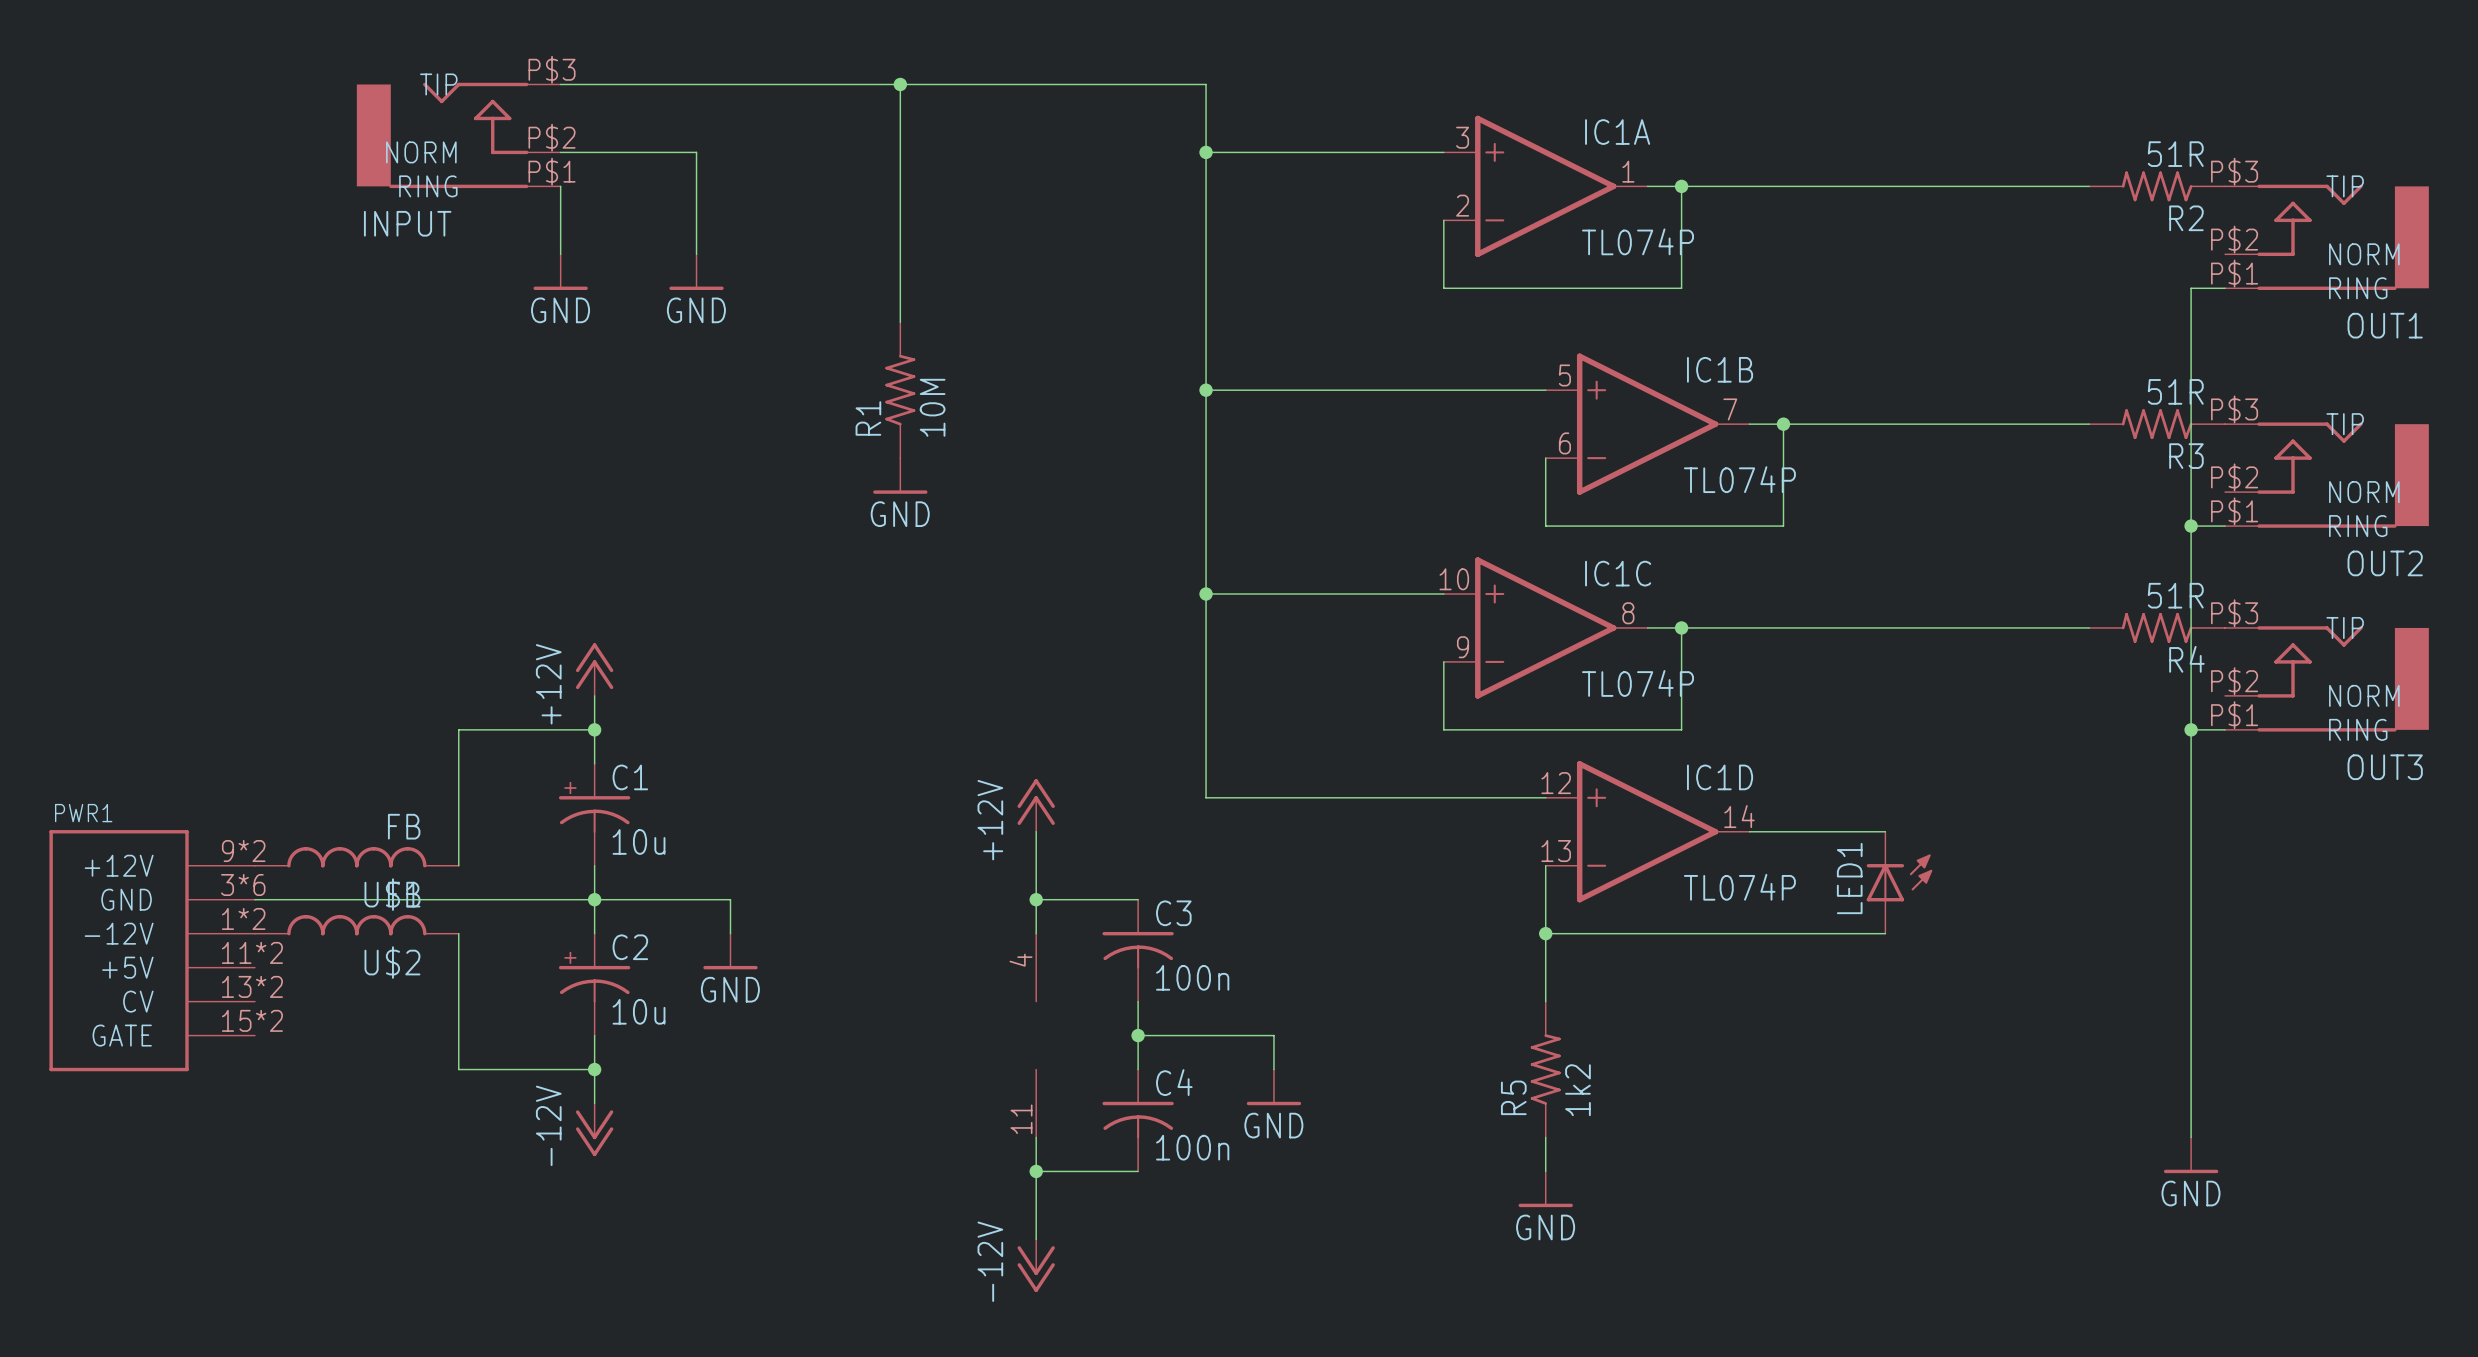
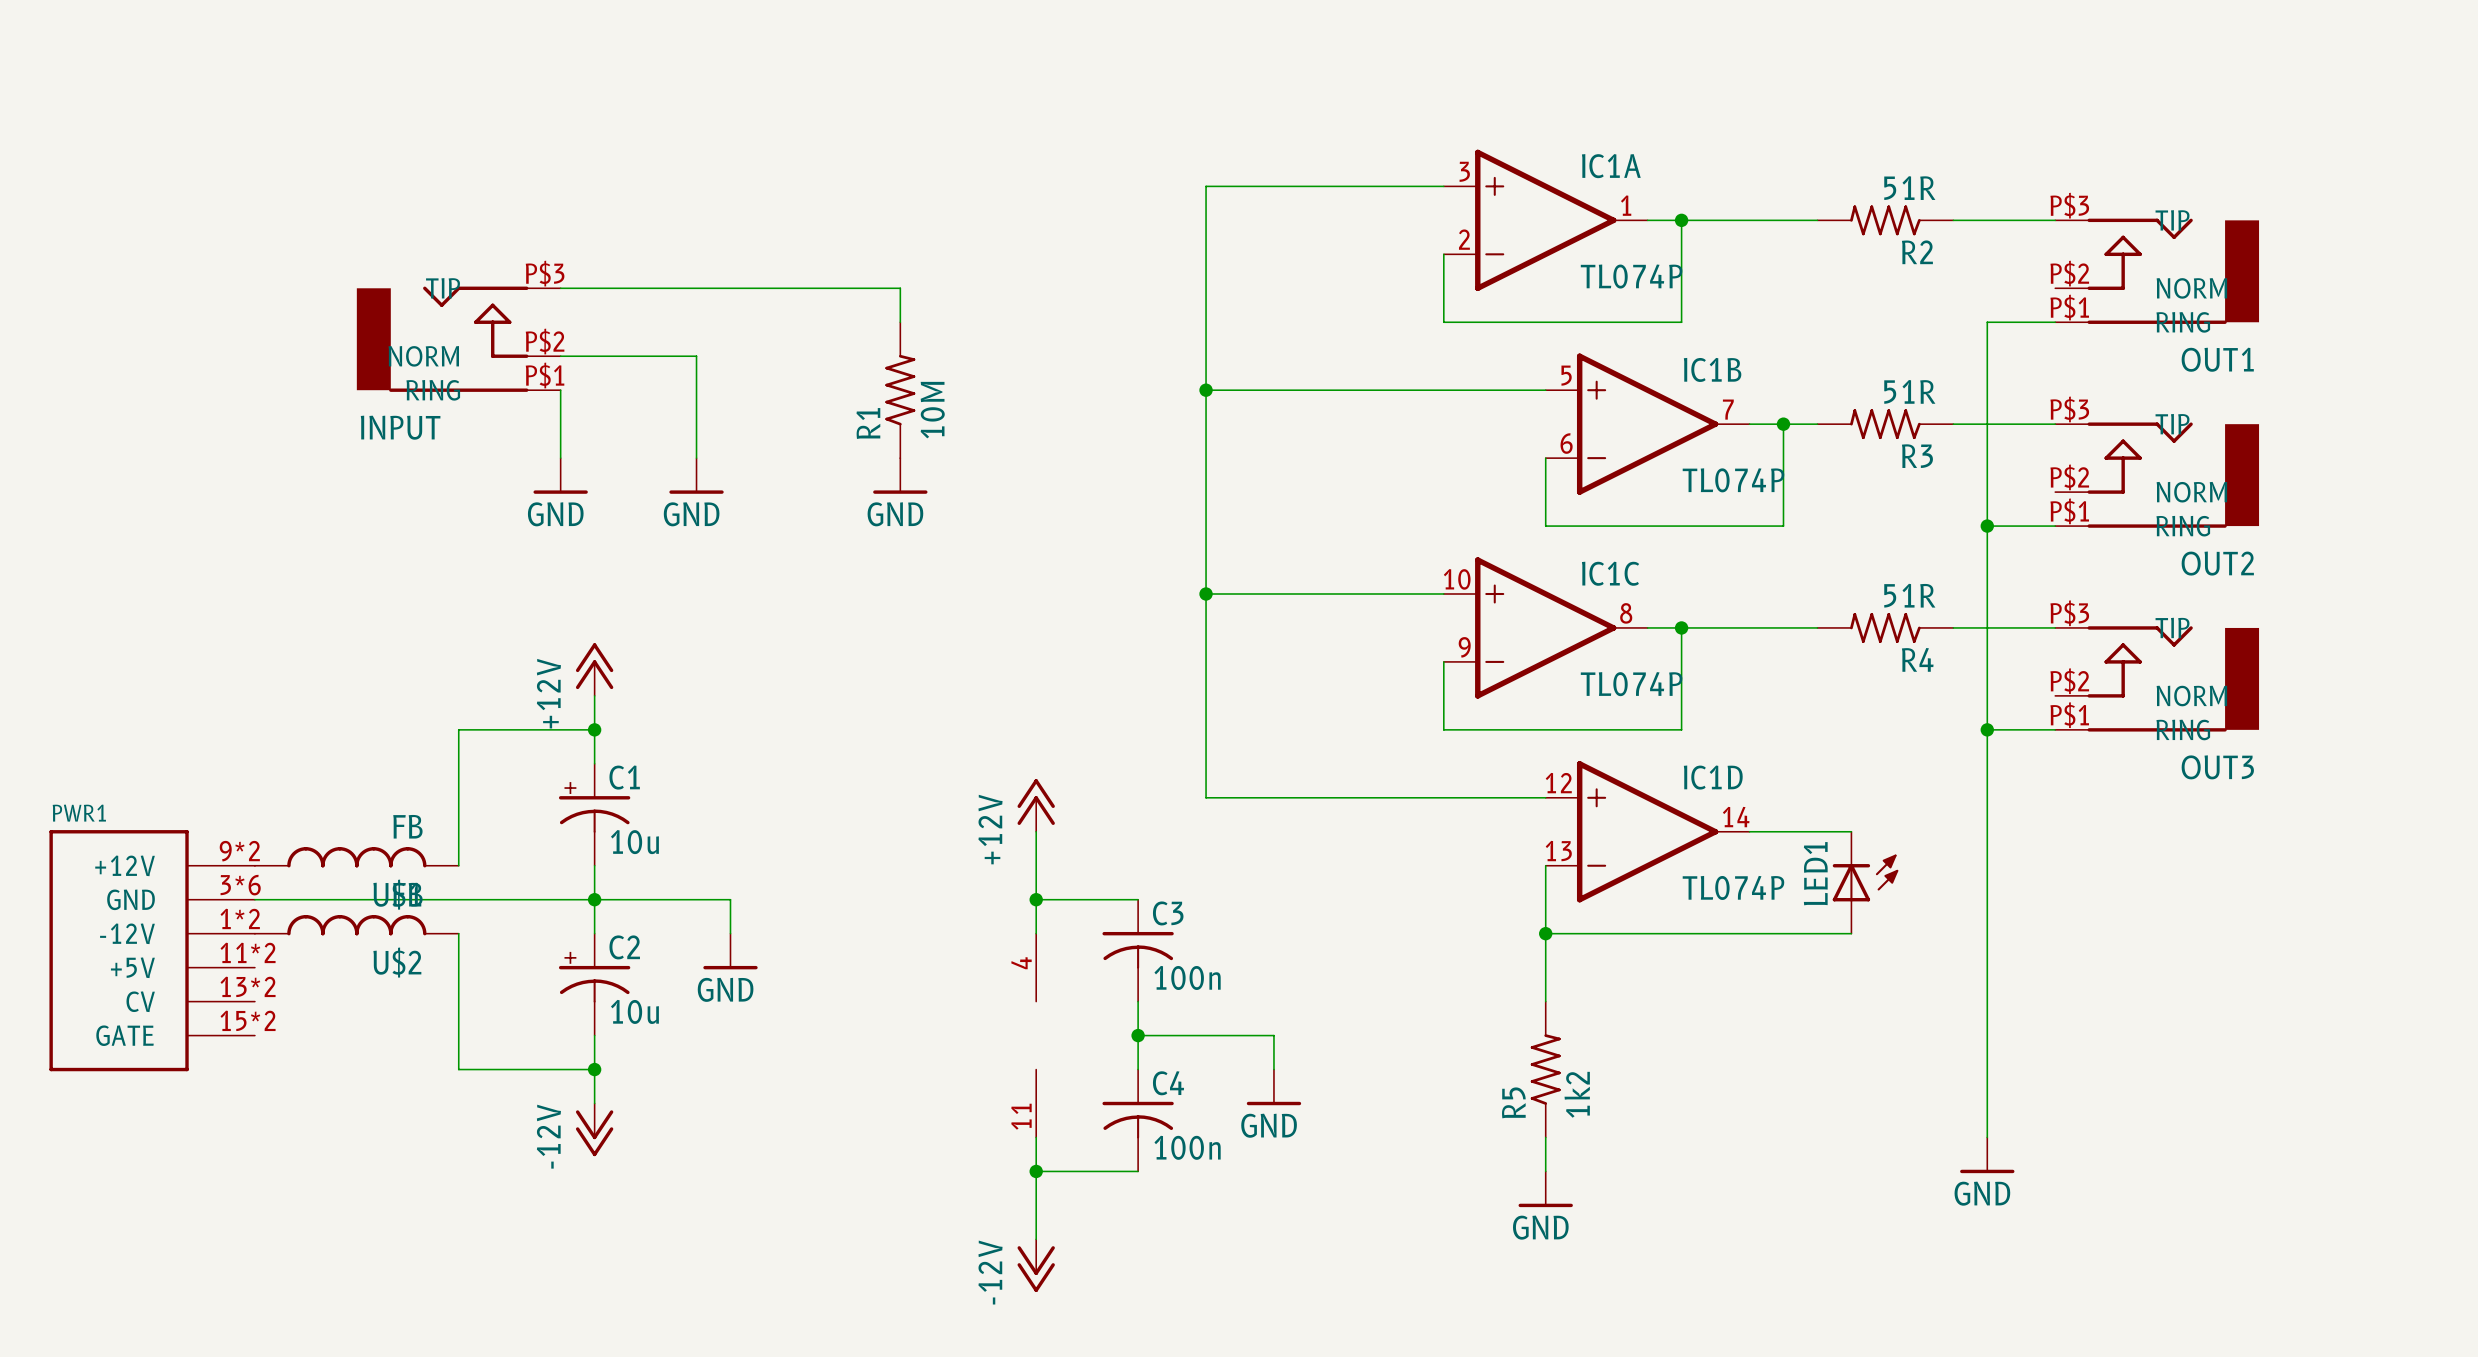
wire: (560, 84) (1206, 84) (1206, 186) -> (1443, 186) (1206, 186)
wire: (900, 84) (900, 288) -> (560, 288) (900, 288)
junction: (900, 84) -> none
INPUT position: (458, 135) -> (458, 339)
wire: (560, 152) (696, 152) (696, 254) -> (560, 356) (696, 356) (696, 458)
wire: (1206, 152) (1443, 152) -> none
junction: (1206, 152) -> none
wire: (560, 186) (560, 254) -> (560, 390) (560, 458)
IC1A position: (1545, 186) -> (1545, 220)
wire: (1647, 186) (2089, 186) -> none
wire: (1681, 186) (1681, 220) -> none
junction position: (1681, 186) -> (1681, 220)
R2 position: (2157, 186) -> (1885, 220)
wire: (1443, 220) (1443, 254) -> none
wire: none -> (1647, 220) (1817, 220)
wire: none -> (1953, 220) (2055, 220)
OUT1 position: (2326, 237) -> (2157, 271)
power symbol: GND (560, 272) -> none
power symbol: GND (696, 272) -> none
wire: (1443, 288) (1681, 288) -> (1443, 288) (1443, 322) (1681, 322) (1681, 288)
wire: (2225, 288) (2191, 288) (2191, 1137) -> none
wire: none -> (2055, 322) (1987, 322) (1987, 1137)
R3 position: (2157, 424) -> (1885, 424)
power symbol: none -> GND (560, 475)
power symbol: none -> GND (696, 475)
OUT2 position: (2326, 475) -> (2157, 475)
wire: none -> (1987, 526) (2055, 526)
junction: none -> (1987, 526)
junction: (2191, 526) -> none
R4 position: (2157, 627) -> (1885, 627)
OUT3 position: (2326, 678) -> (2157, 678)
wire: none -> (1987, 729) (2055, 729)
junction: none -> (1987, 729)
junction: (2191, 729) -> none
wire: (1851, 831) (1885, 831) -> none
LED1 position: (1899, 882) -> (1865, 882)
wire: (1851, 933) (1885, 933) -> none
power symbol position: GND (2191, 1155) -> GND (1987, 1155)

